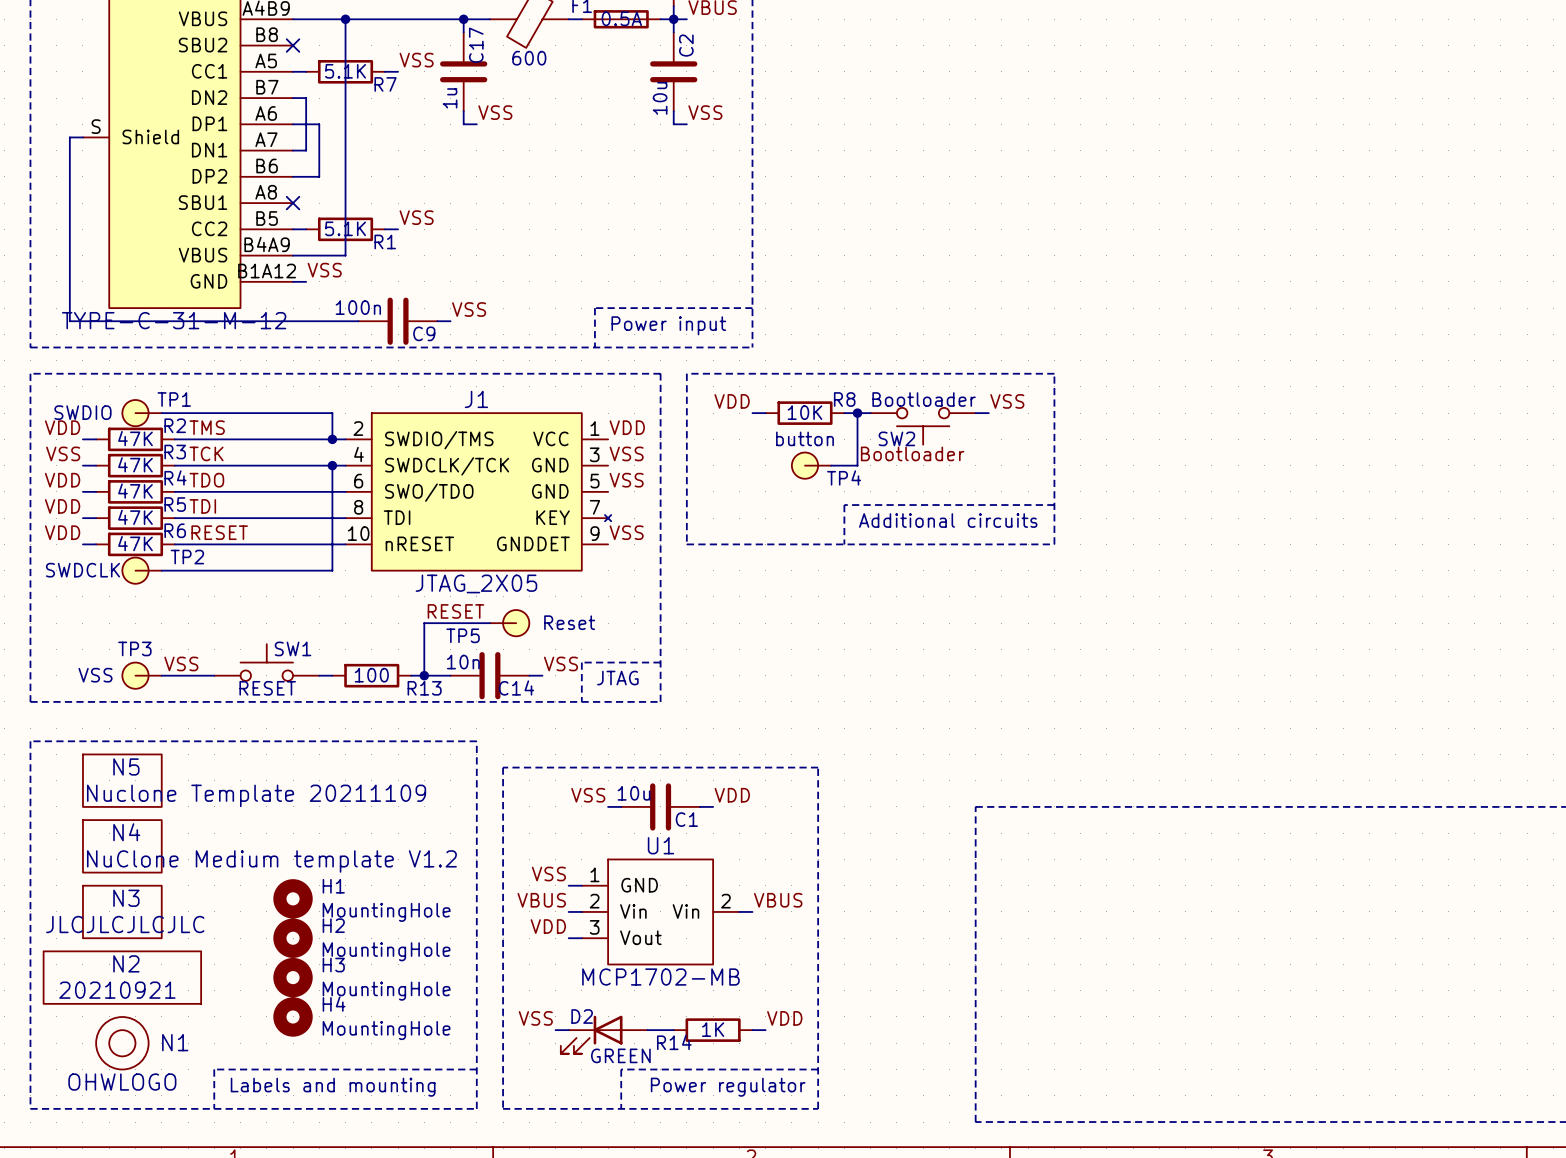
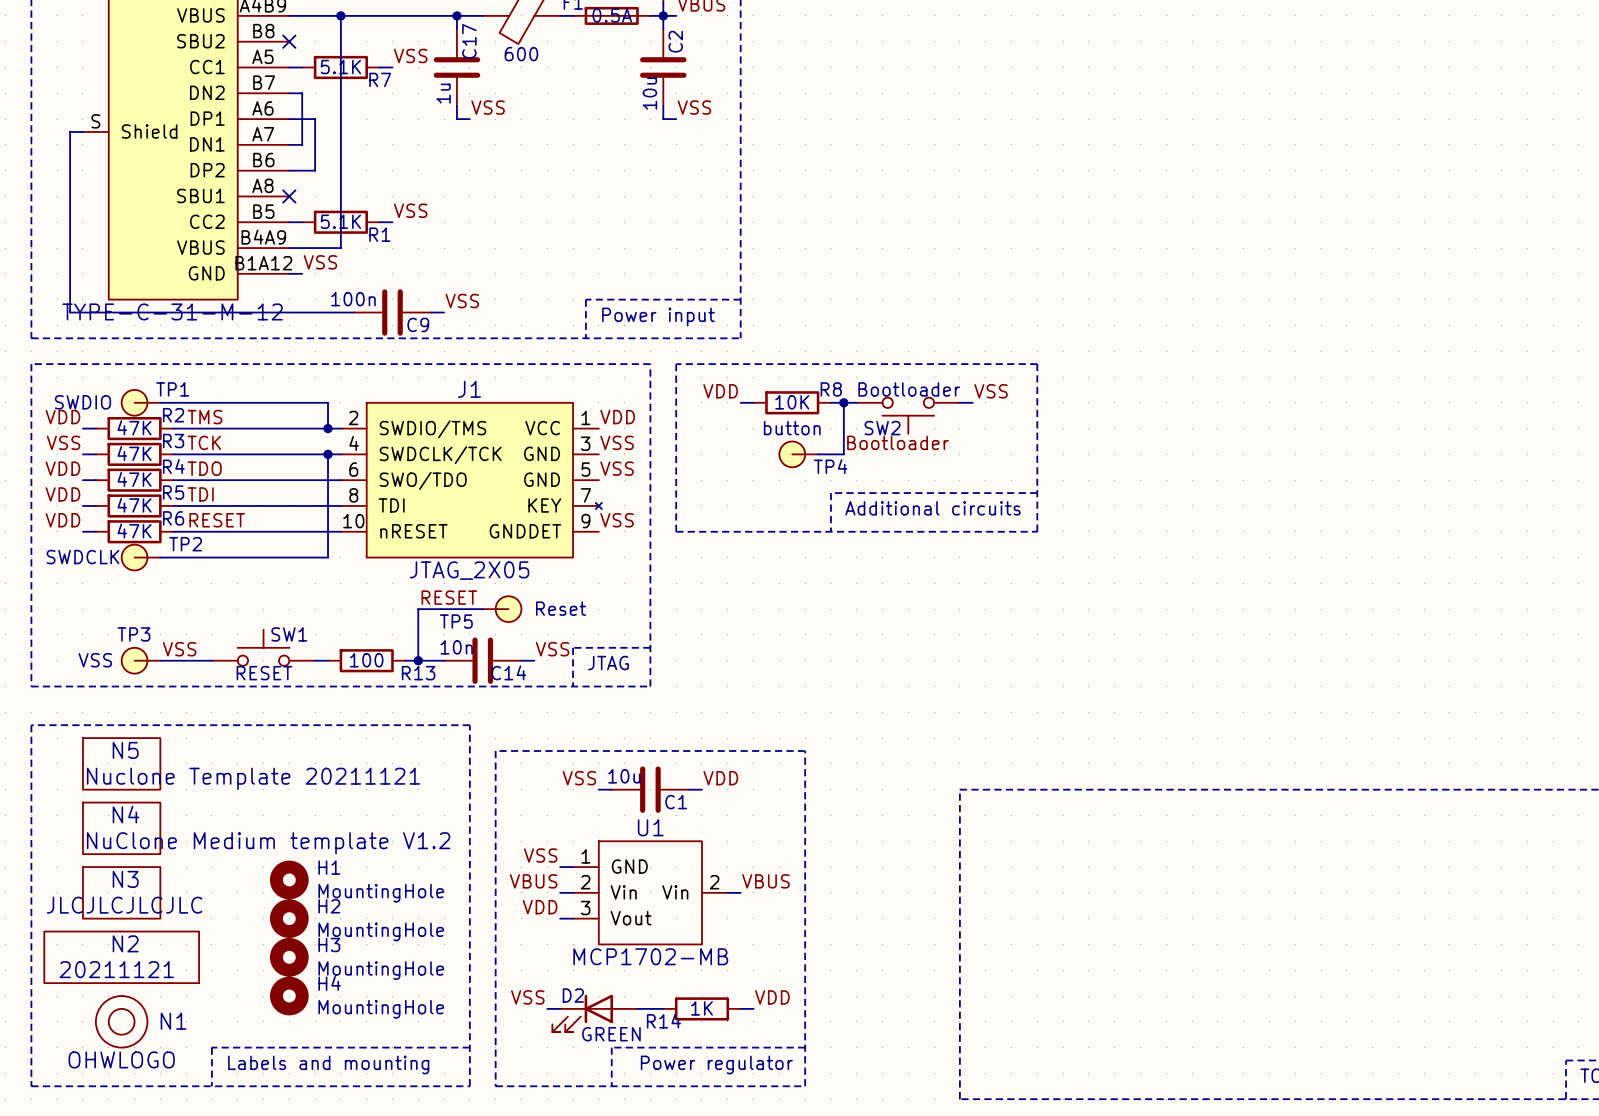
N5 value: Nuclone Template 20211109 (256, 795) -> Nuclone Template 20211121 (253, 778)
N2 value: 20210921 (117, 990) -> 20211121 (116, 969)

